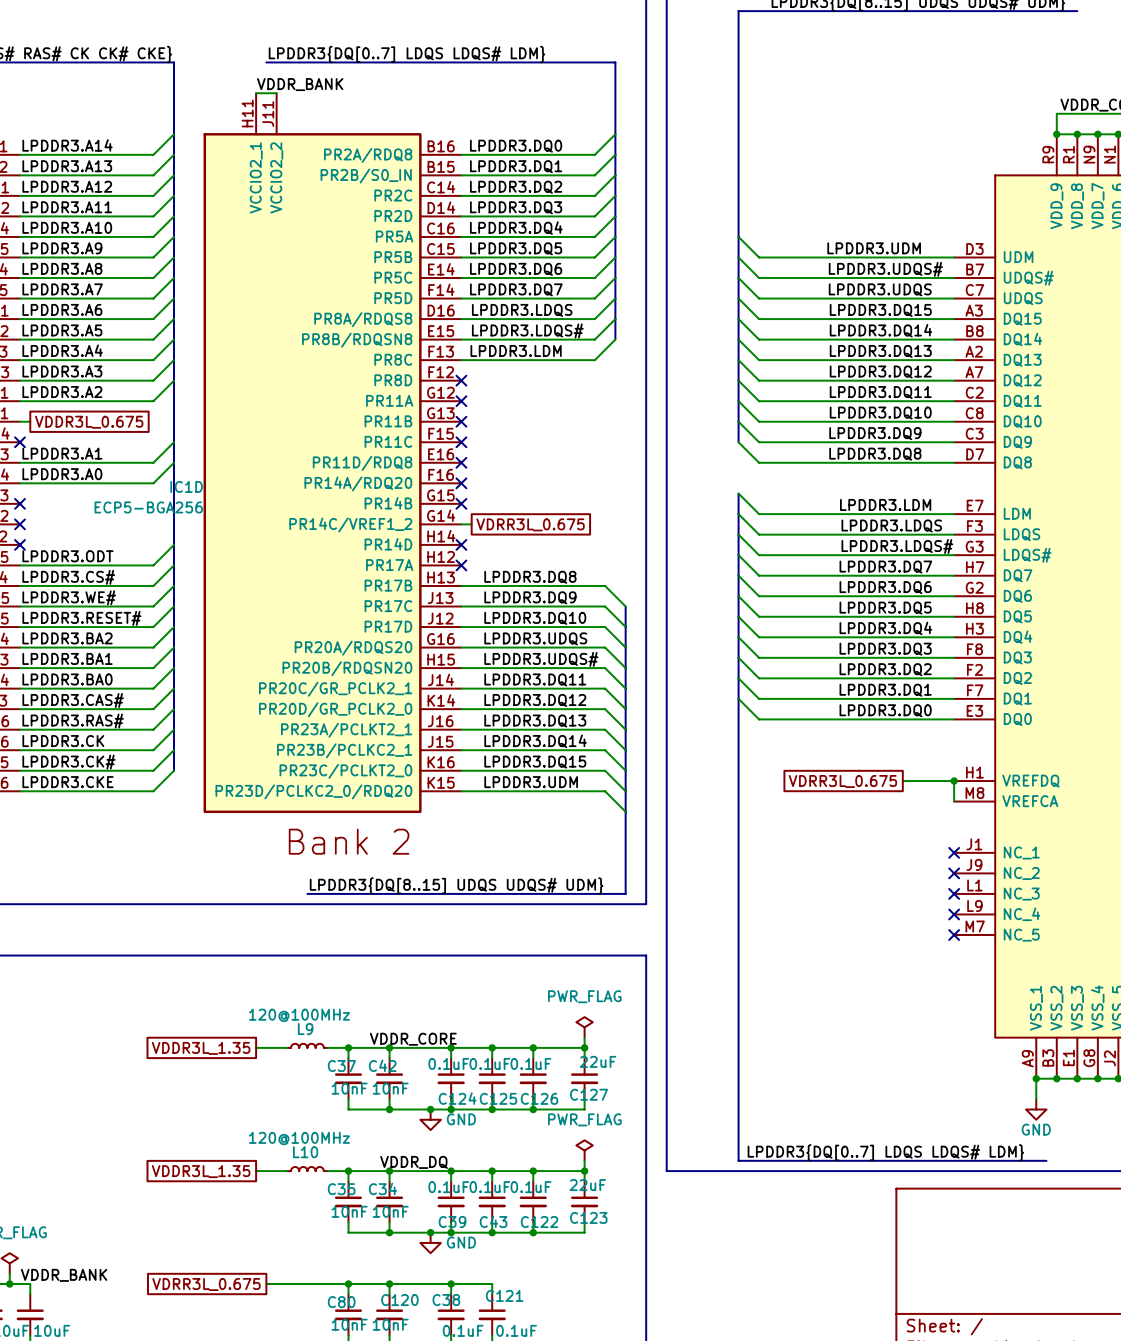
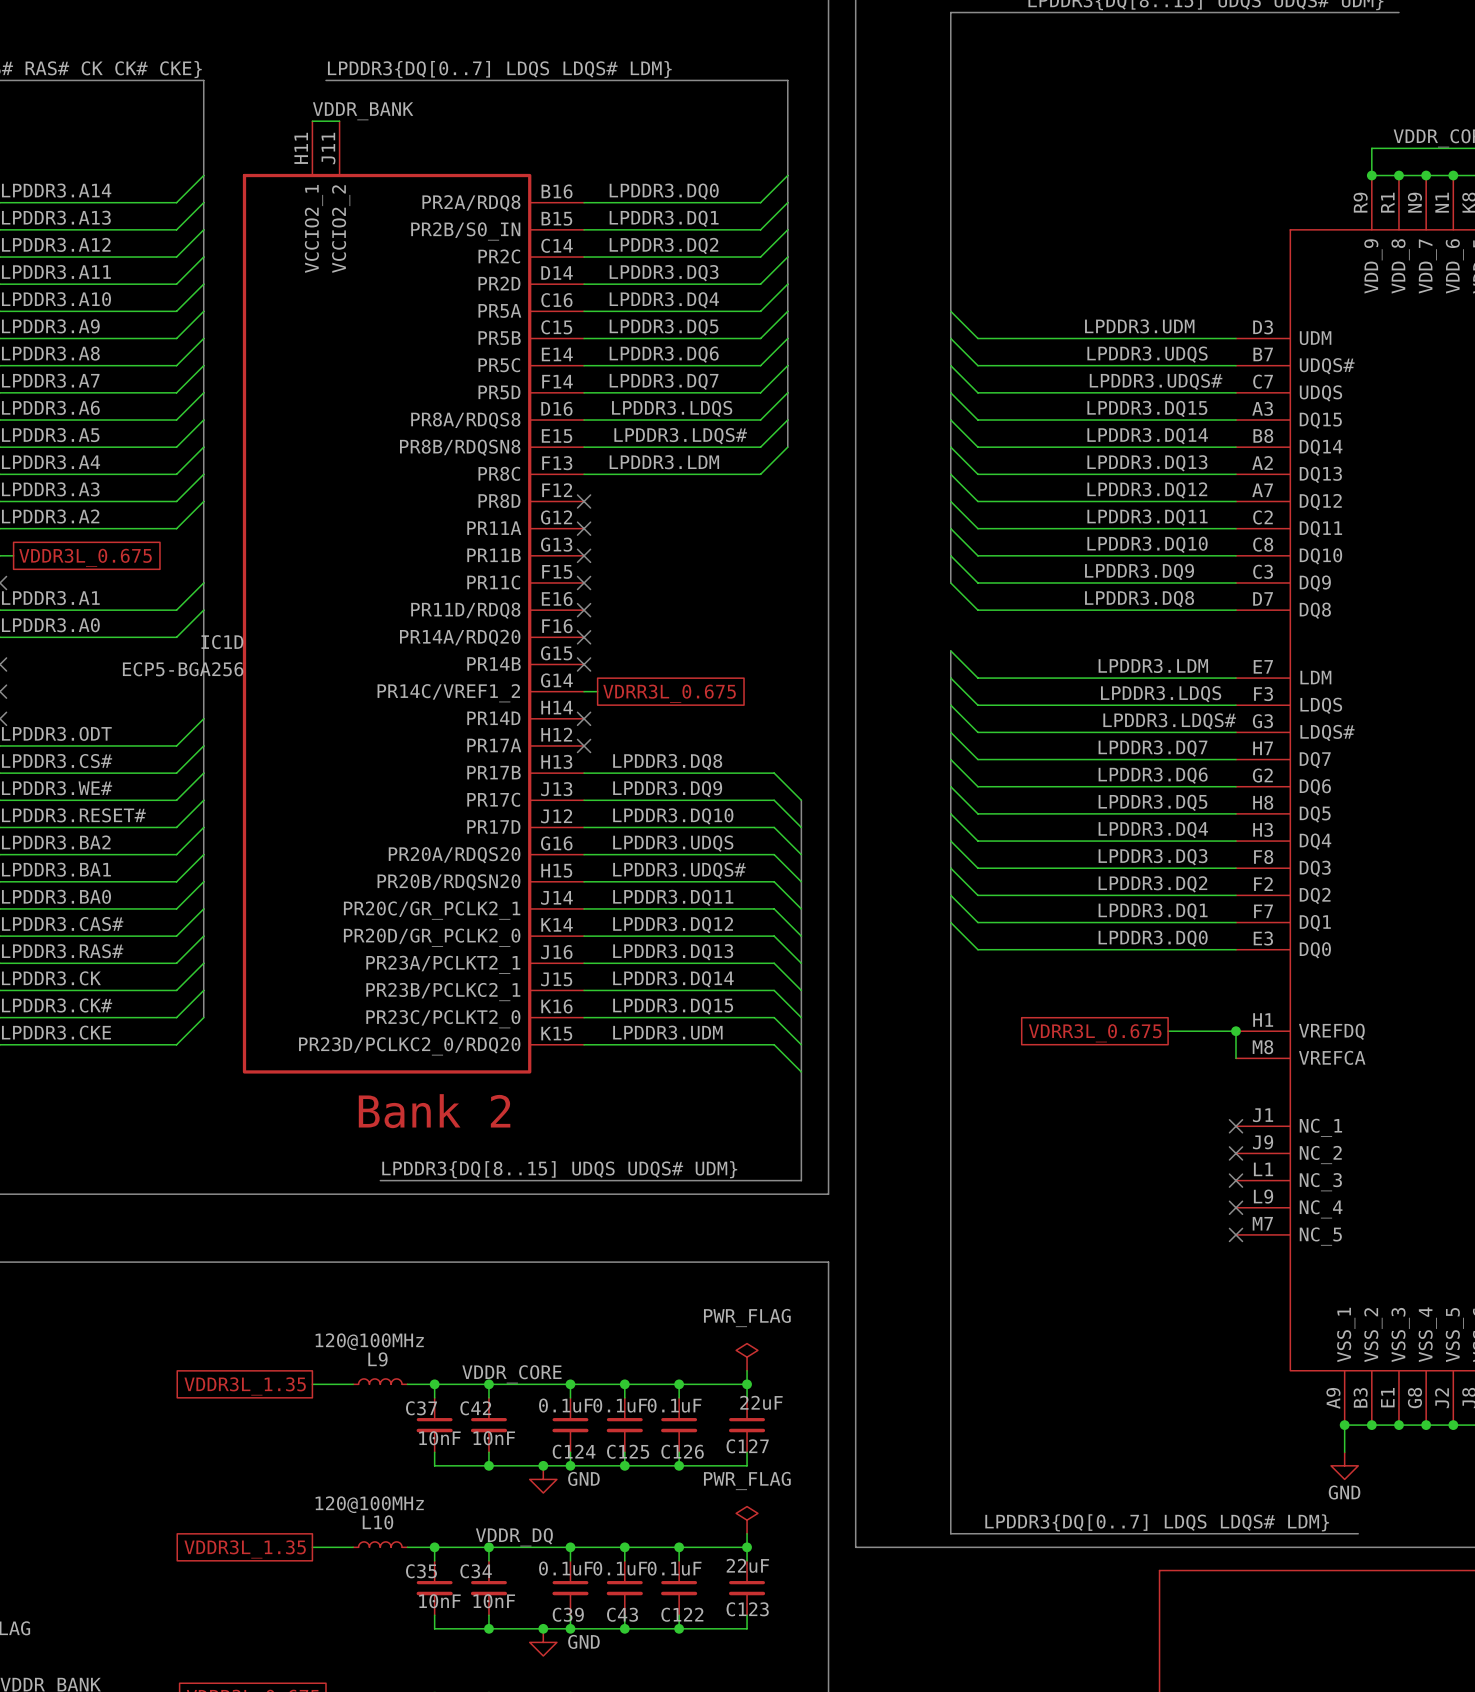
label position: LPDDR3.UDQS# (885, 269) -> LPDDR3.UDQS# (1156, 381)
label position: LPDDR3.UDQS (880, 289) -> LPDDR3.UDQS (1147, 354)

